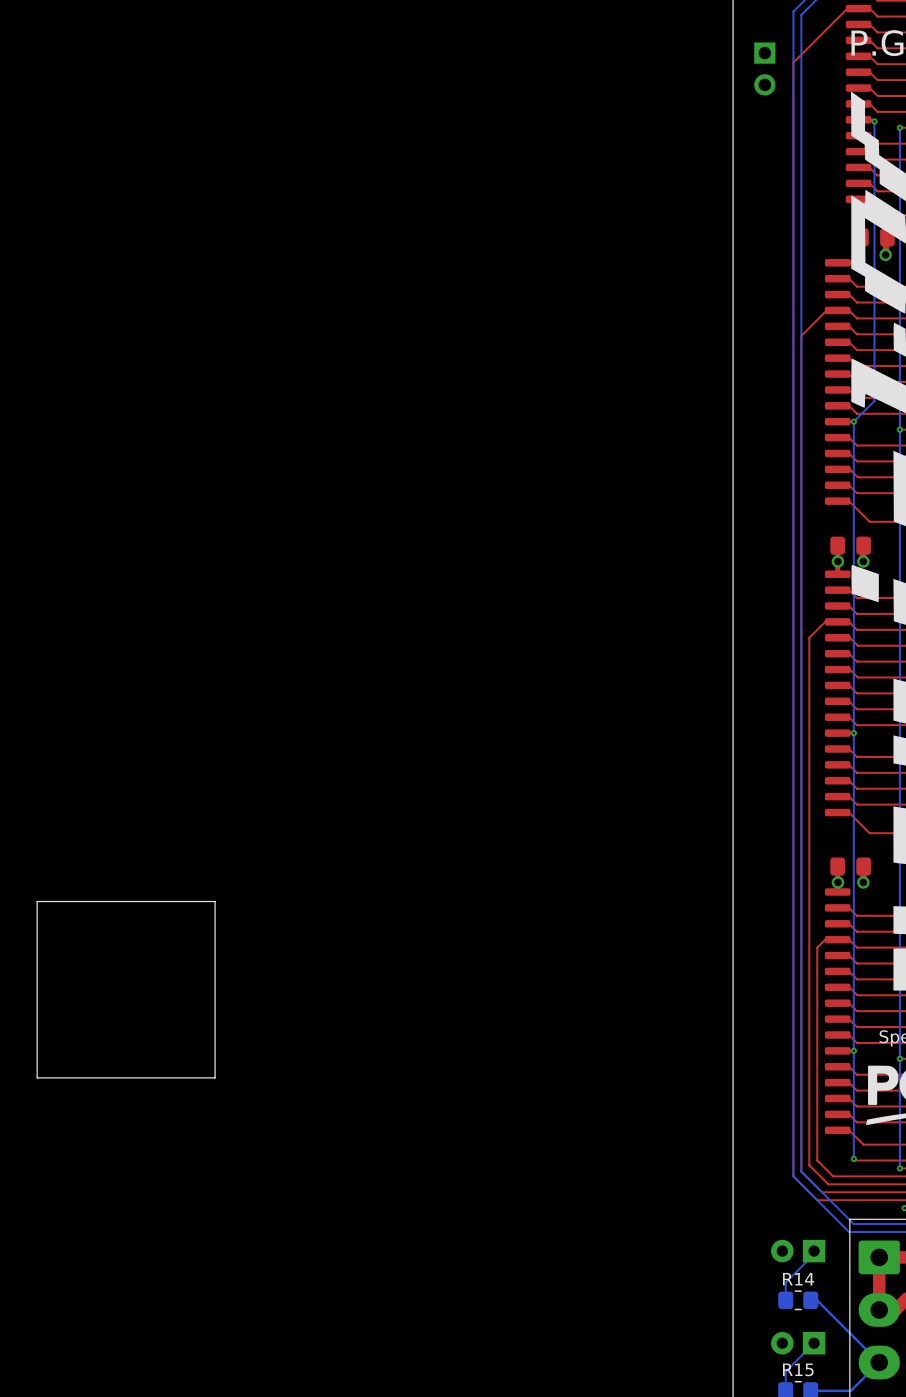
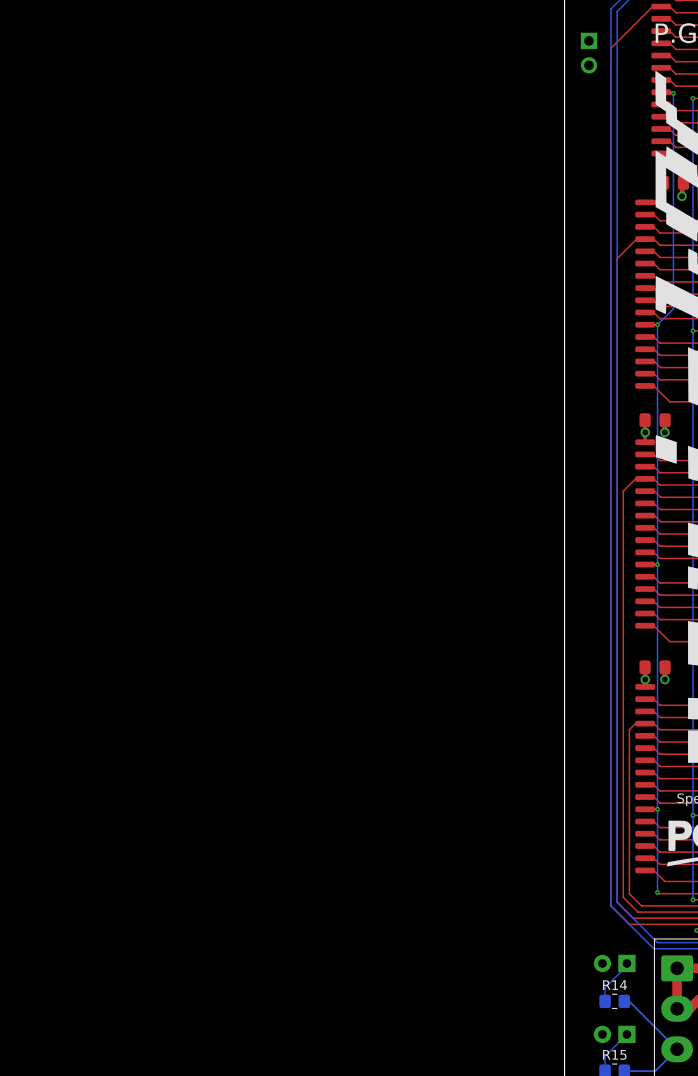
line: (215, 901) (37, 901) (37, 1077) (215, 1077) (215, 901) -> none

